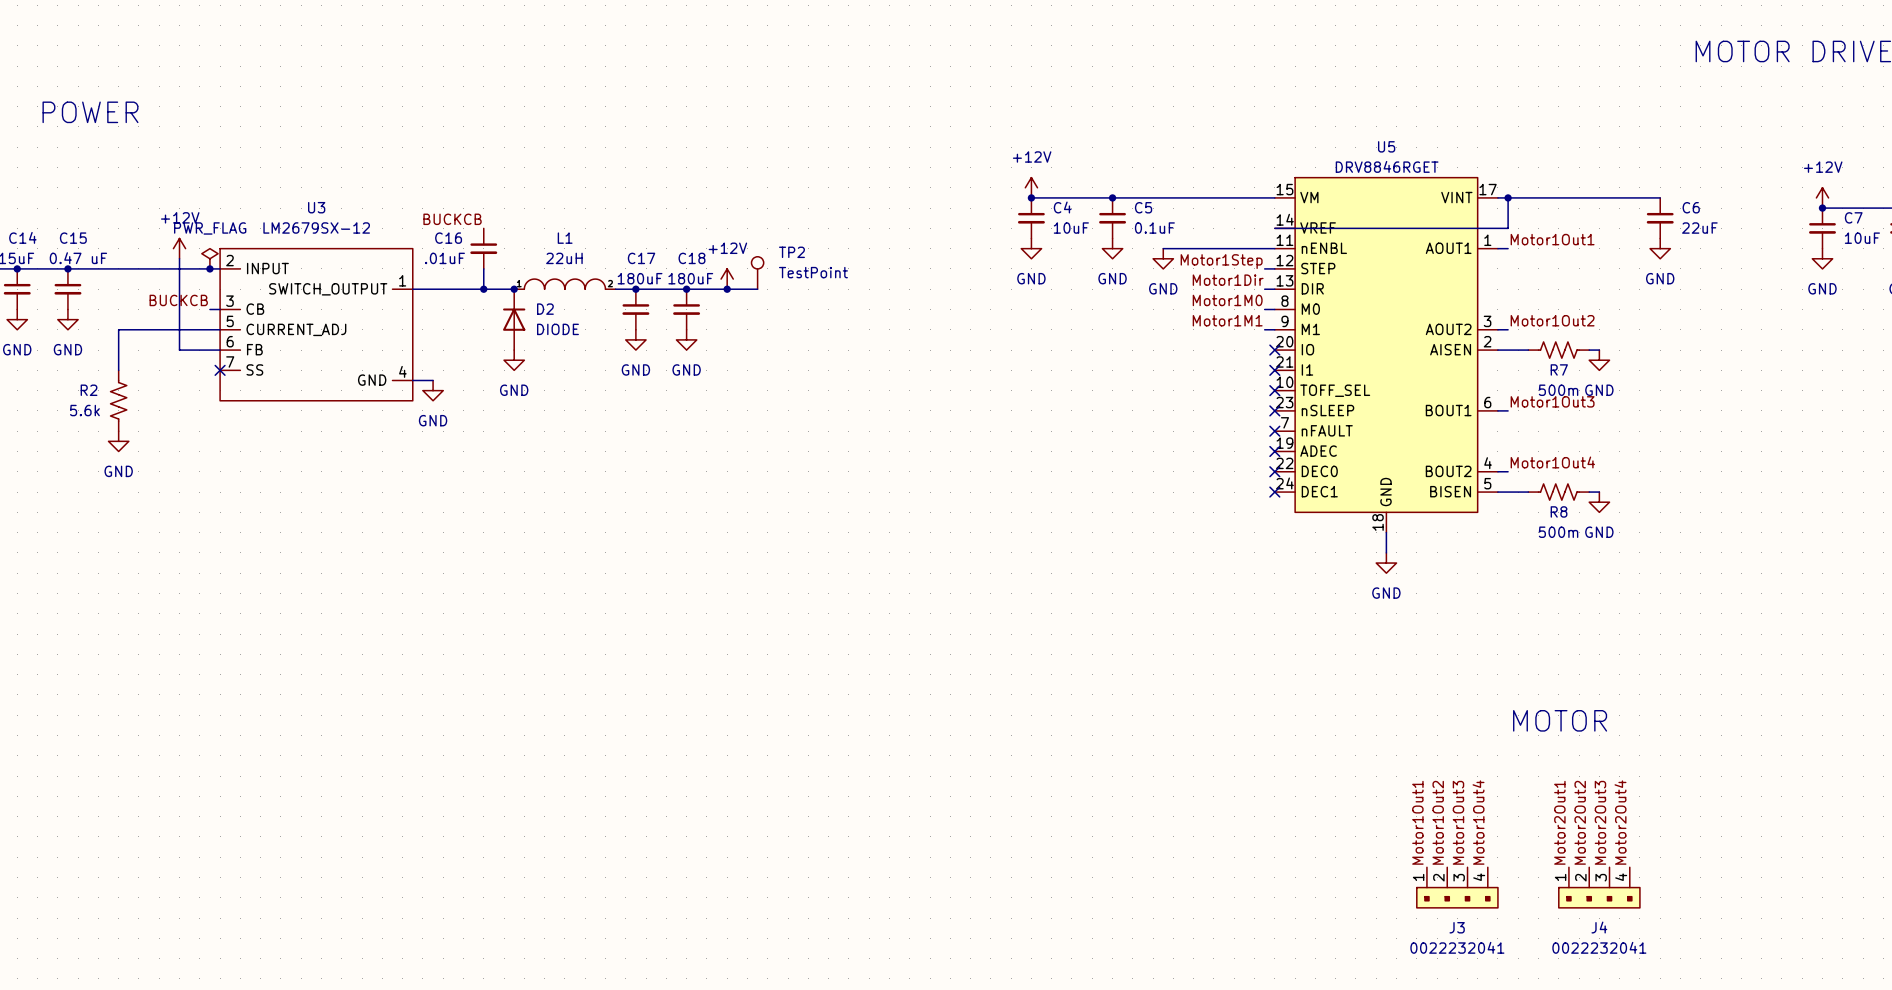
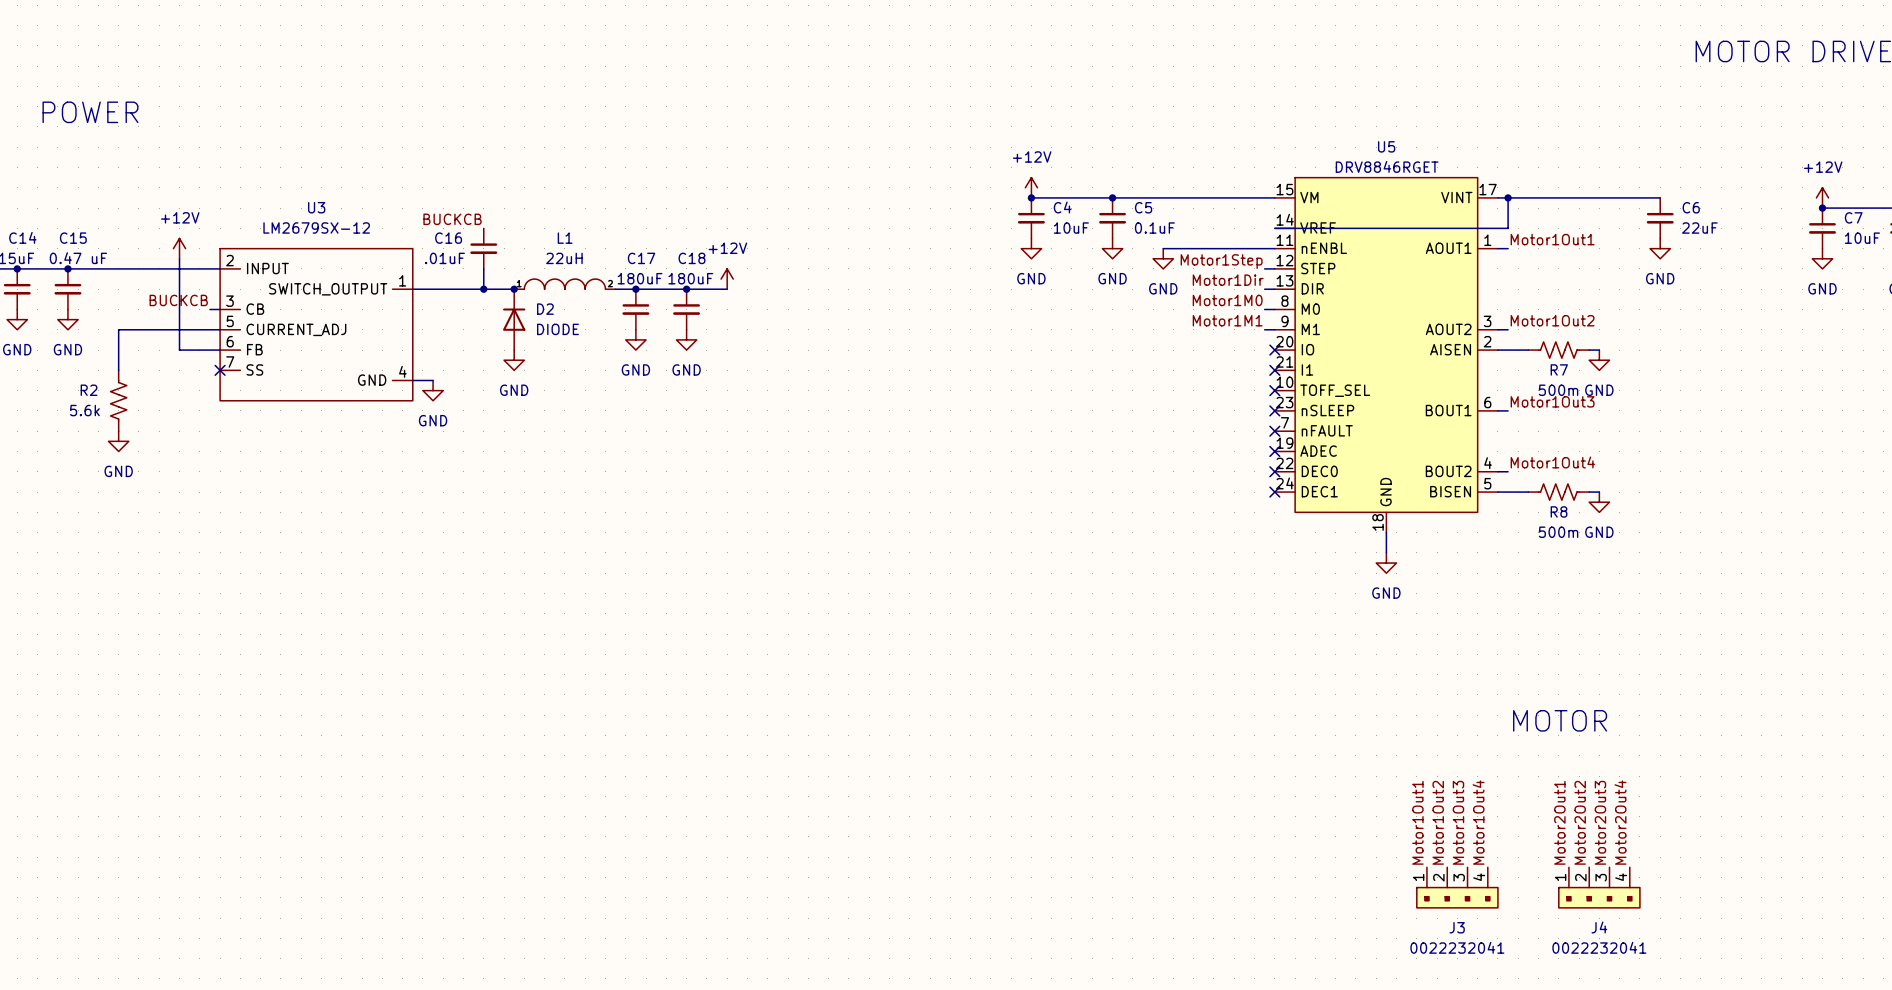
power symbol: PWR_FLAG (209, 258) -> none
junction: (209, 268) -> none
TP2: TestPoint (757, 272) -> none
wire: (727, 289) (757, 289) -> none
junction: (727, 289) -> none

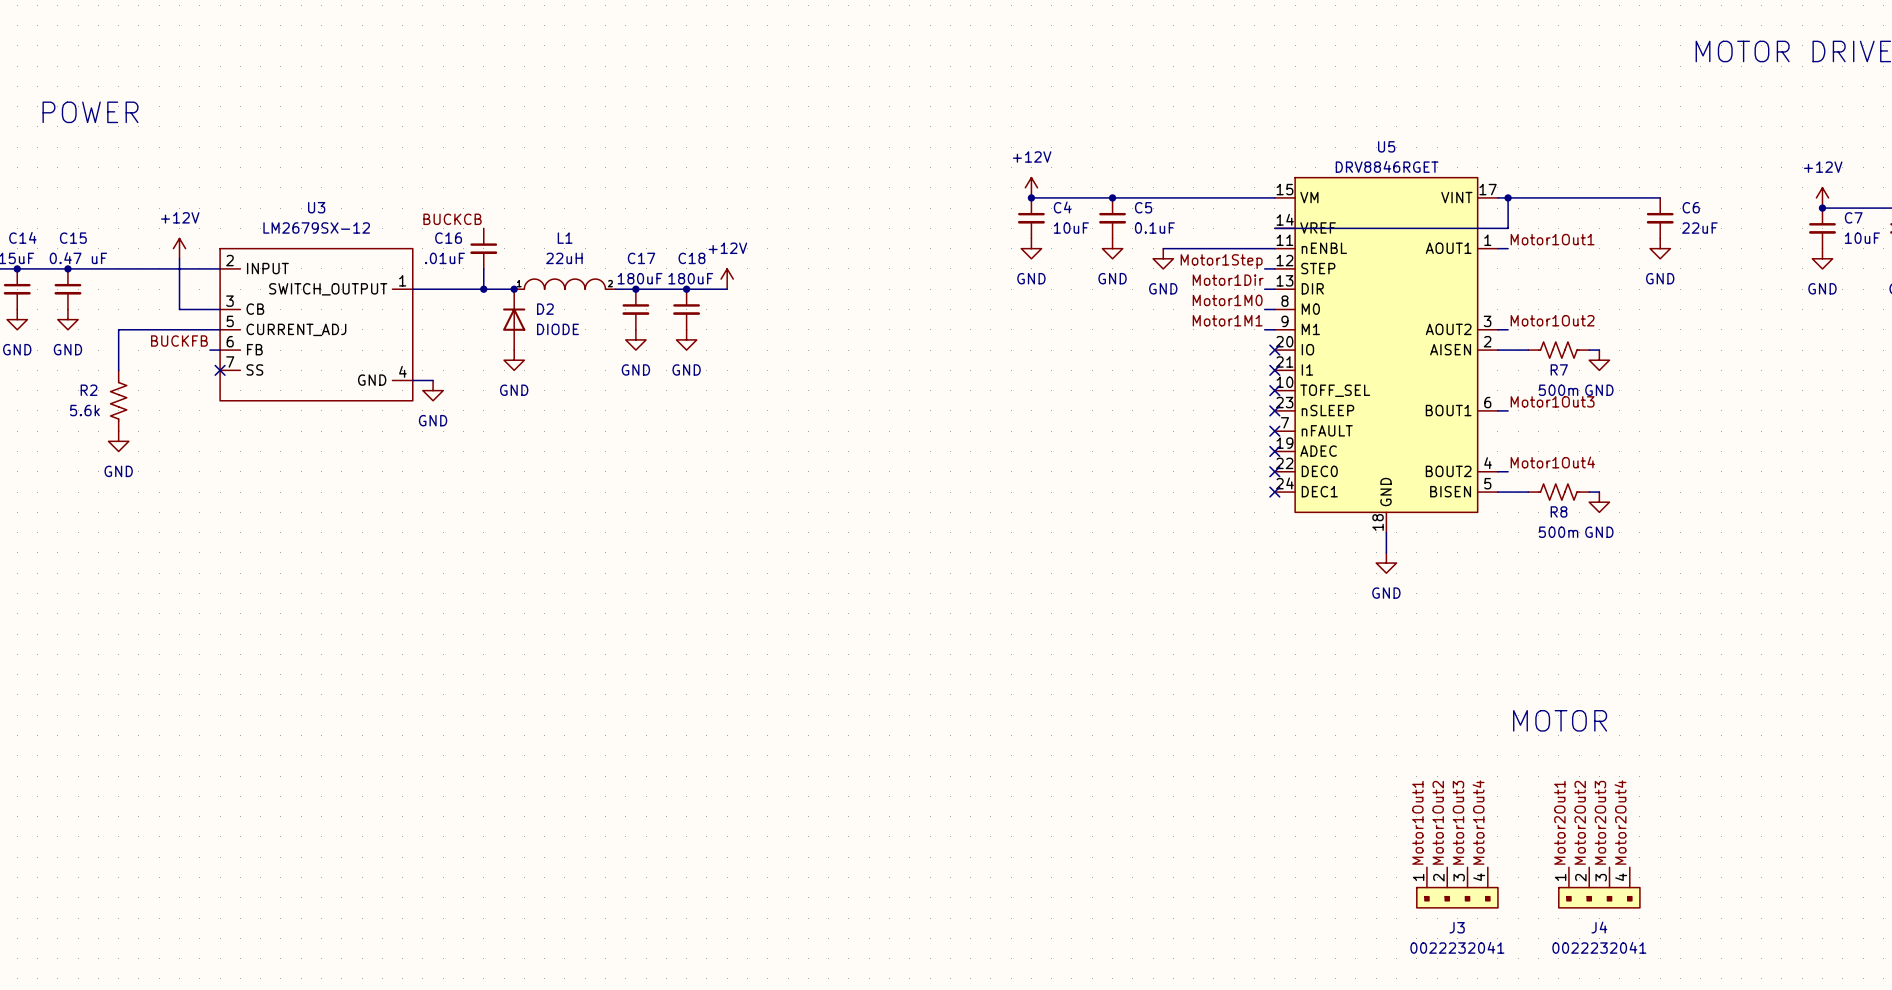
label: BUCKCB (178, 300) -> none
wire: (179, 309) (179, 350) (209, 350) -> (179, 309) (209, 309)
label: none -> BUCKFB (179, 341)

